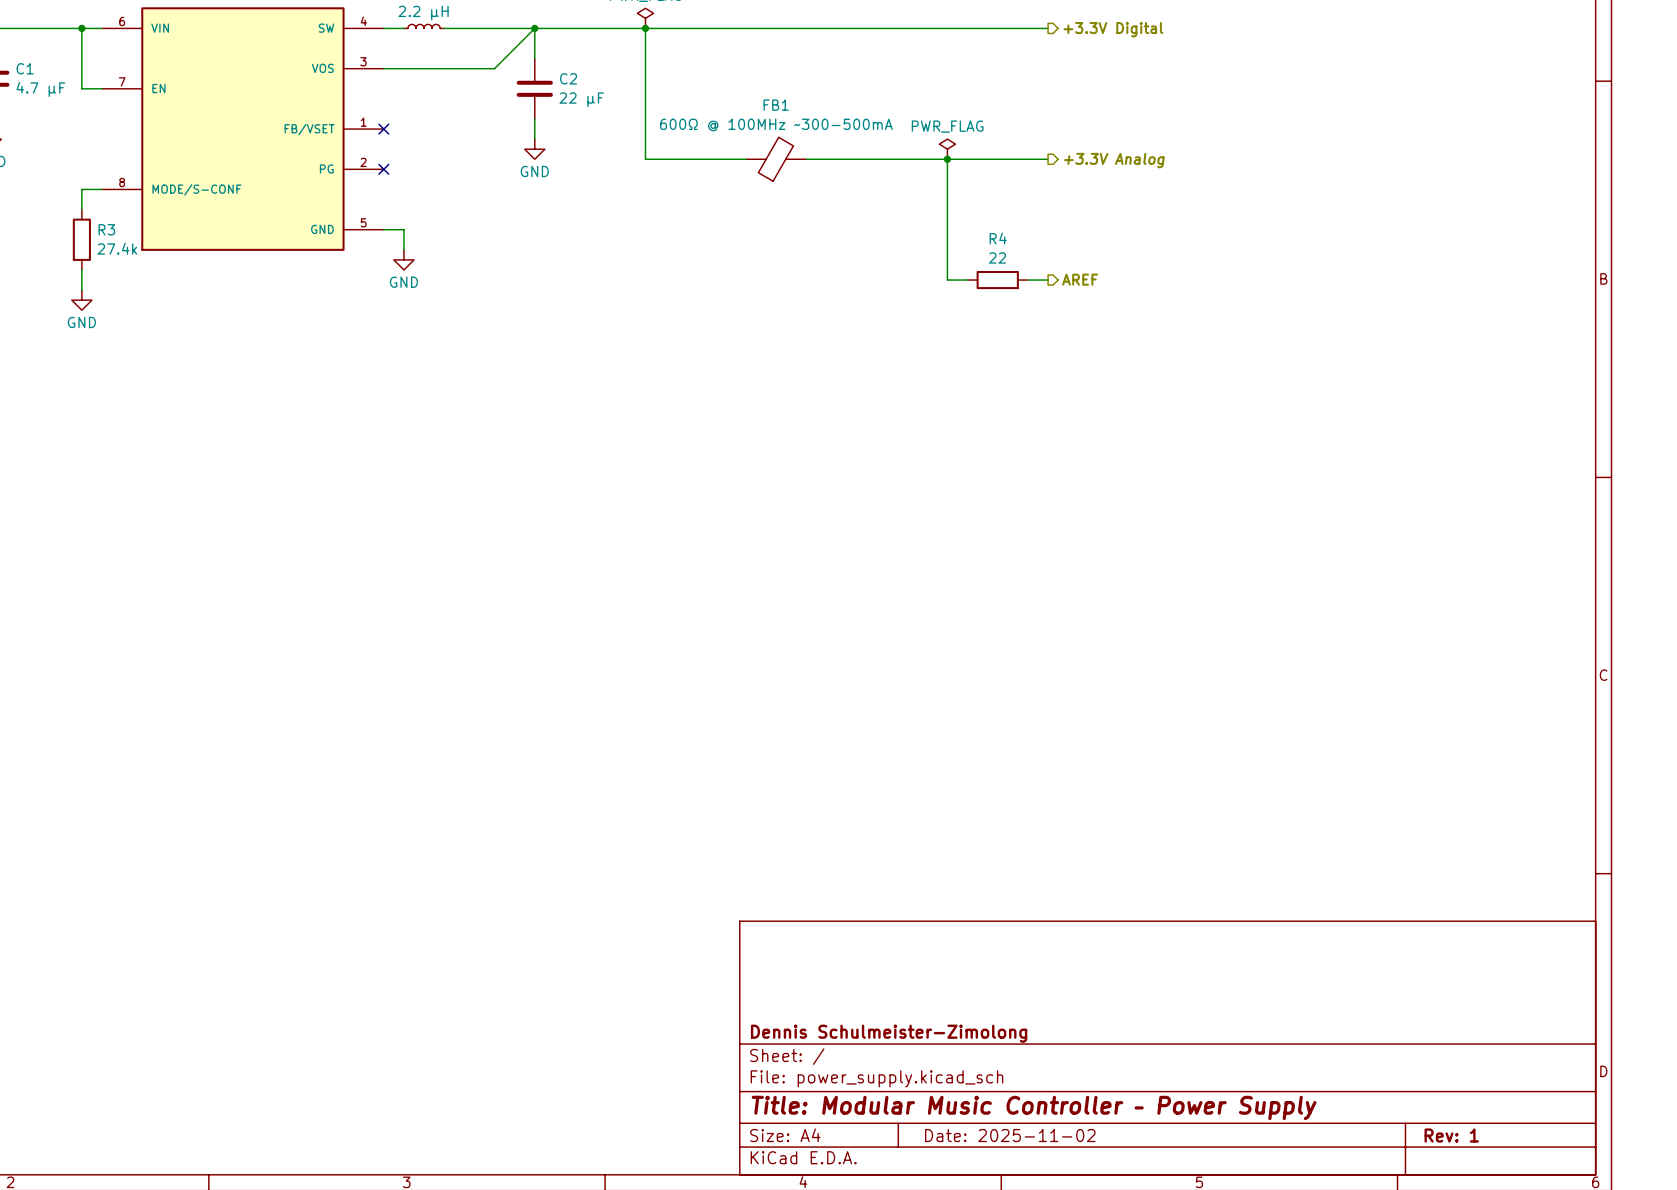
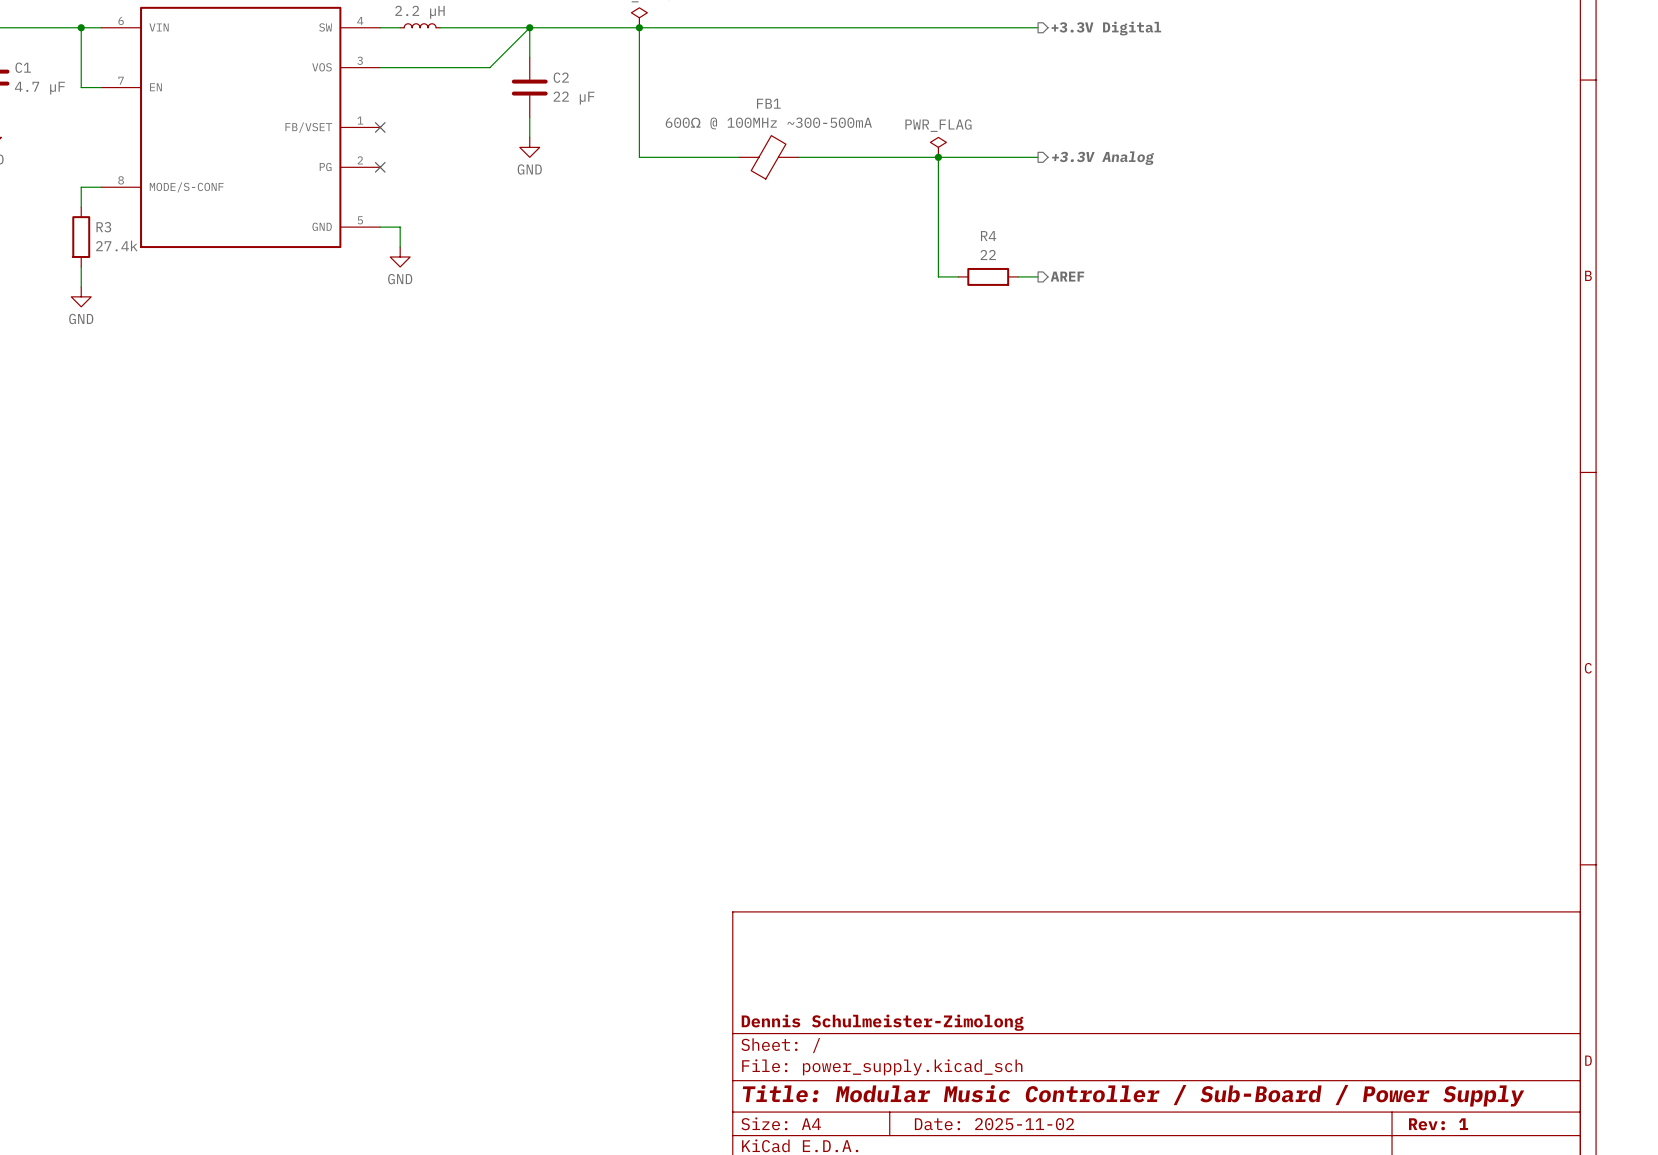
title block: Title: Modular Music Controller – Power Supply (1034, 1107) -> Title: Modular Music Controller / Sub-Board / Power Supply (1133, 1095)

